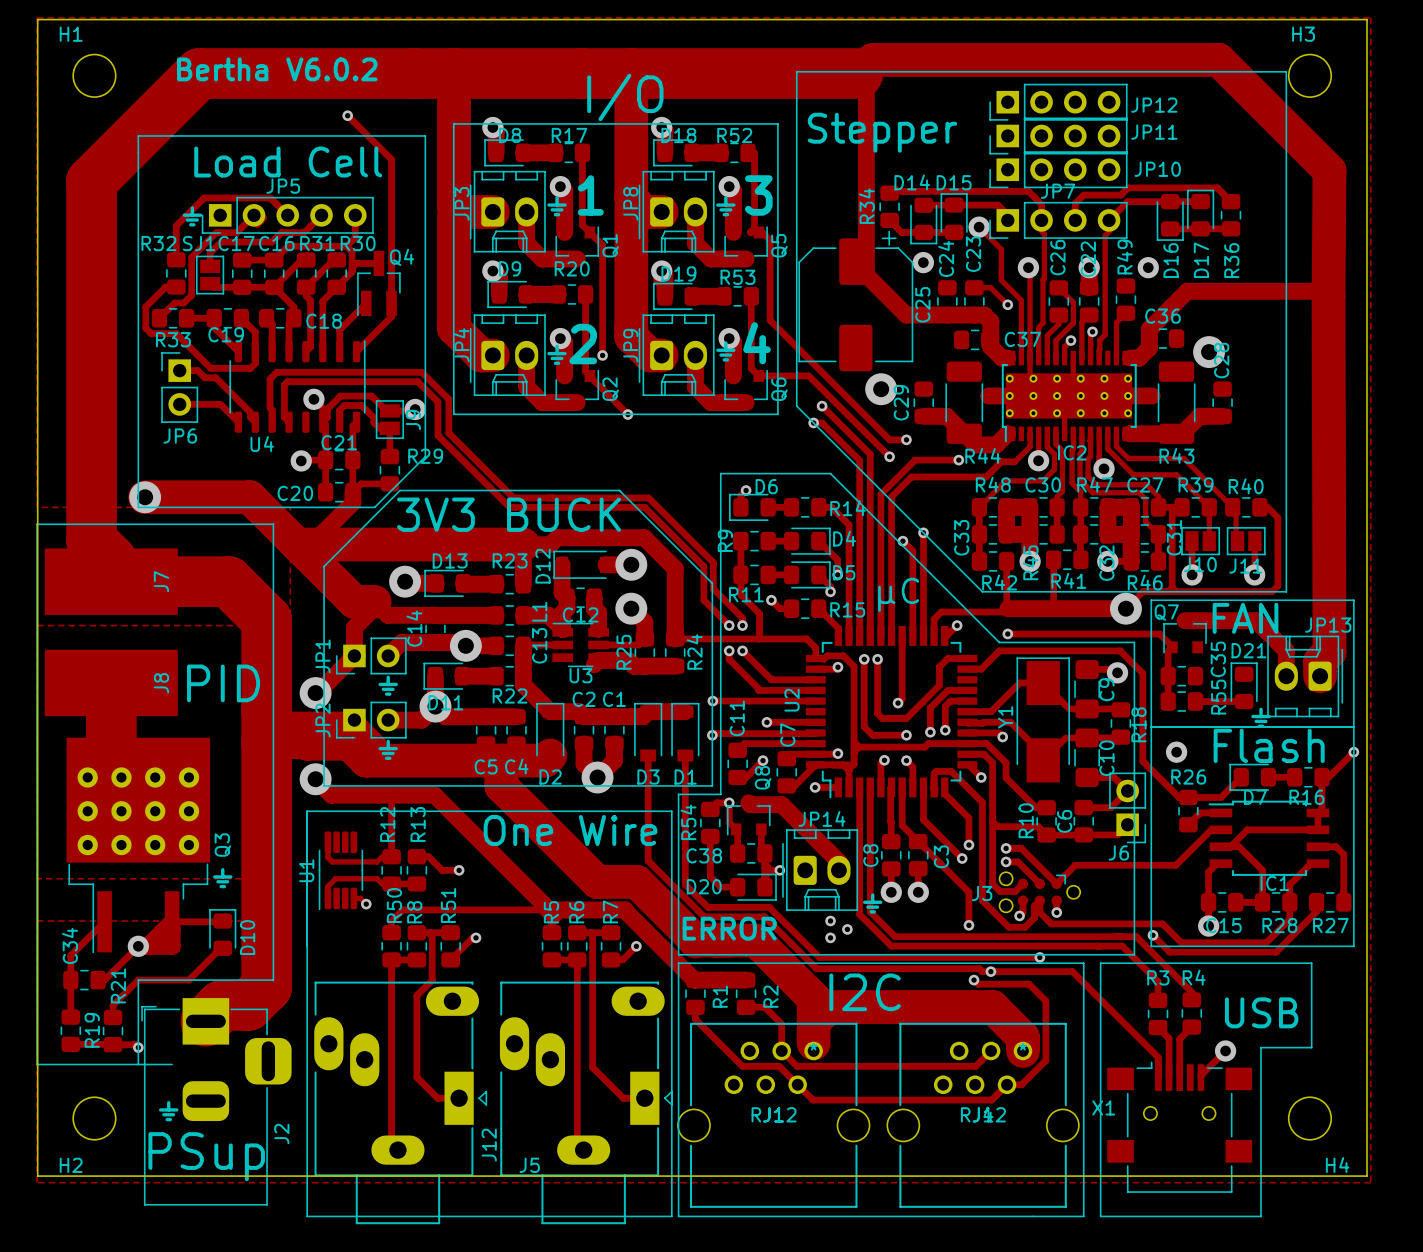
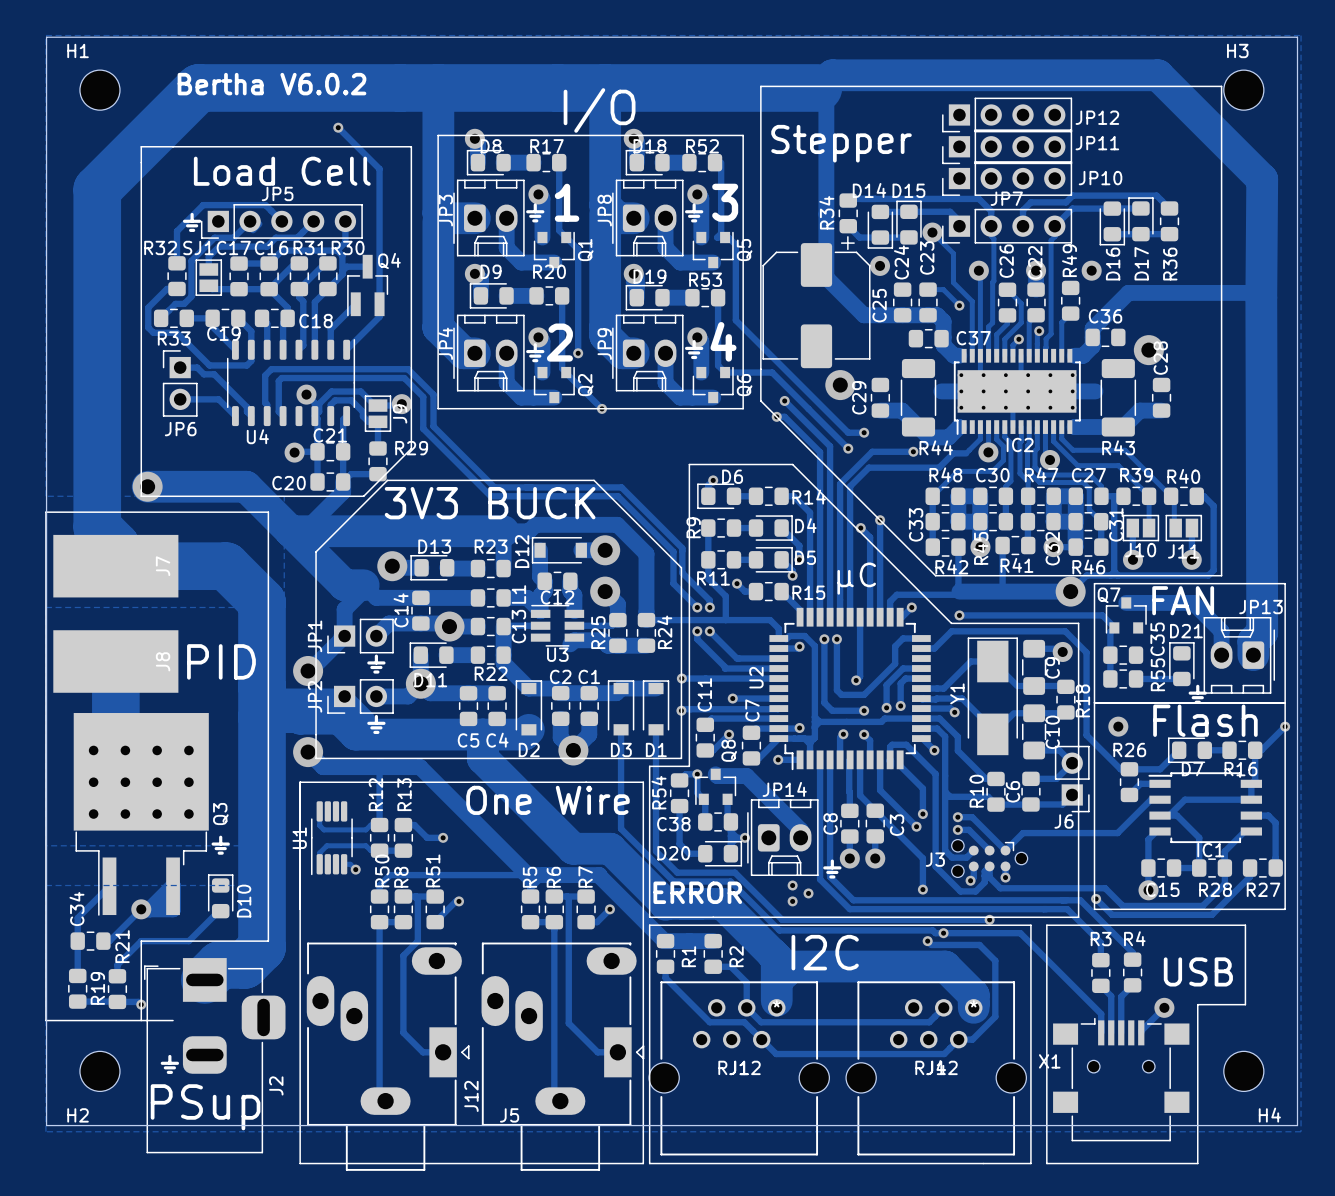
track: (222, 921) (172, 921) -> none

